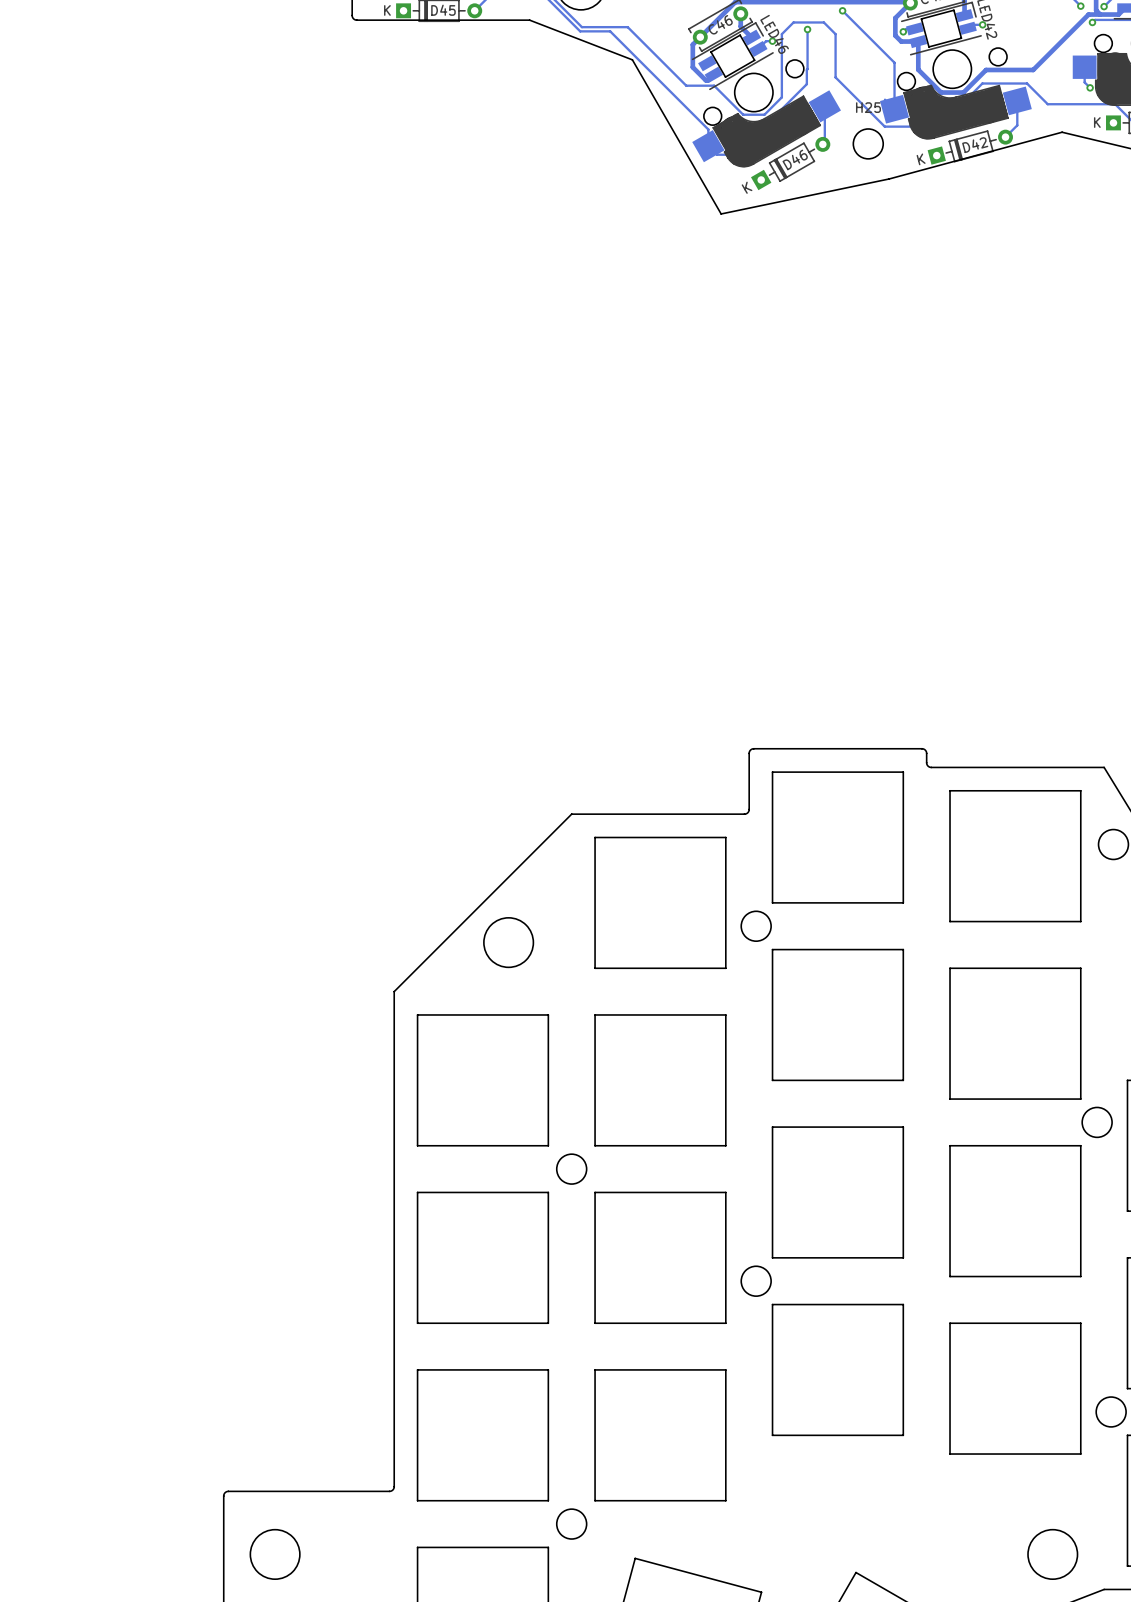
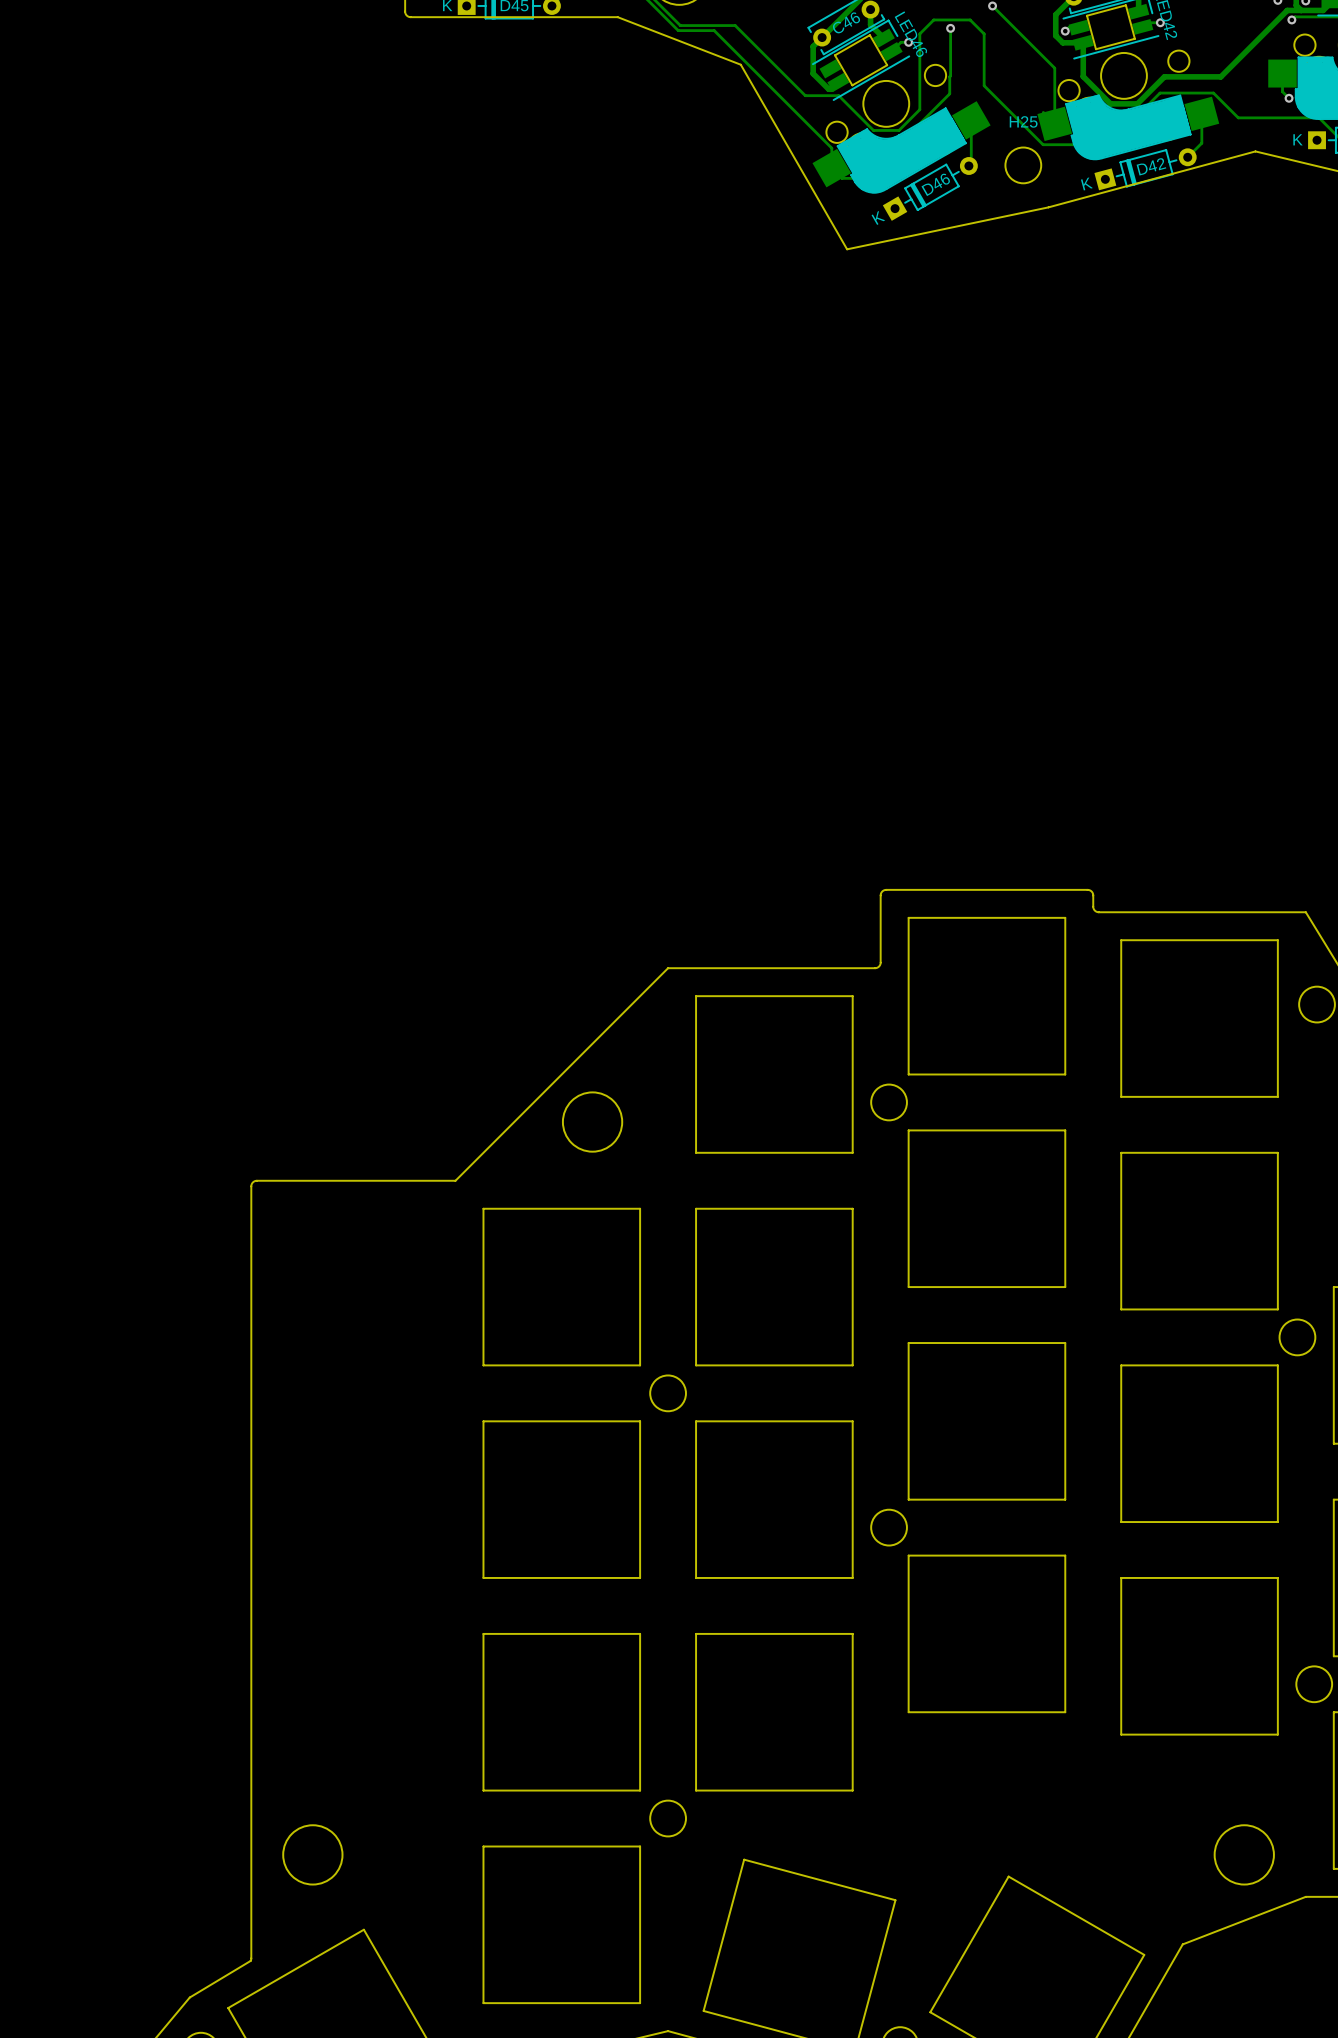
board edge: (394, 991) (394, 1487) (389, 1491) (228, 1491) (223, 1496) -> (455, 1180) (256, 1180) (251, 1184) (251, 1784)

